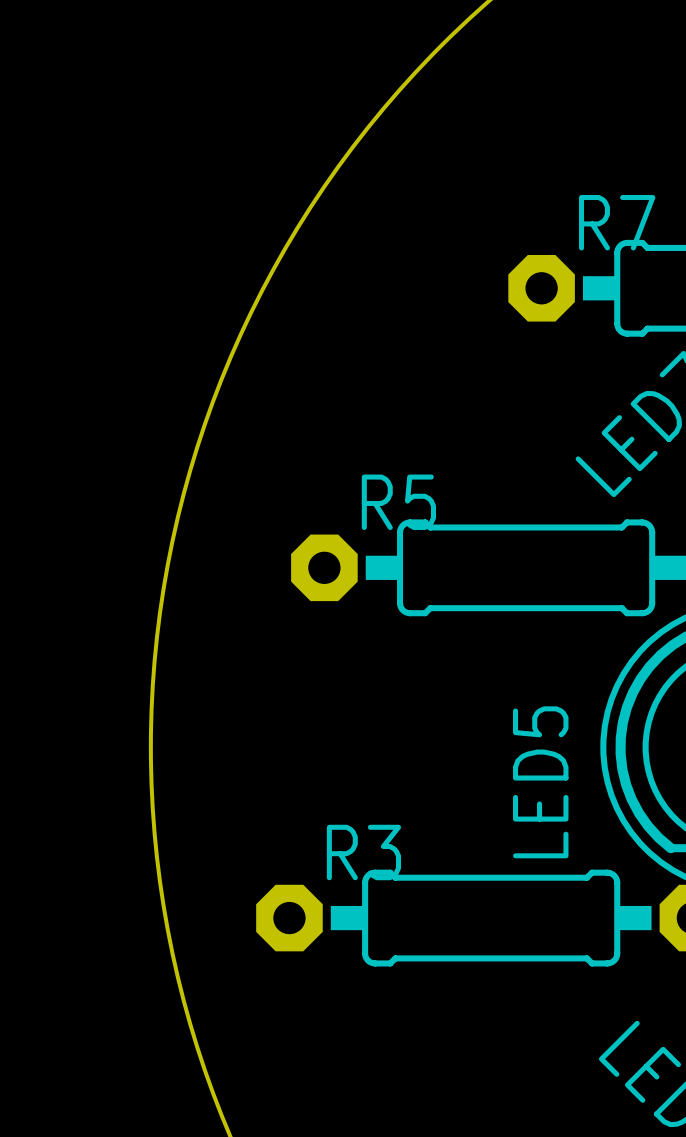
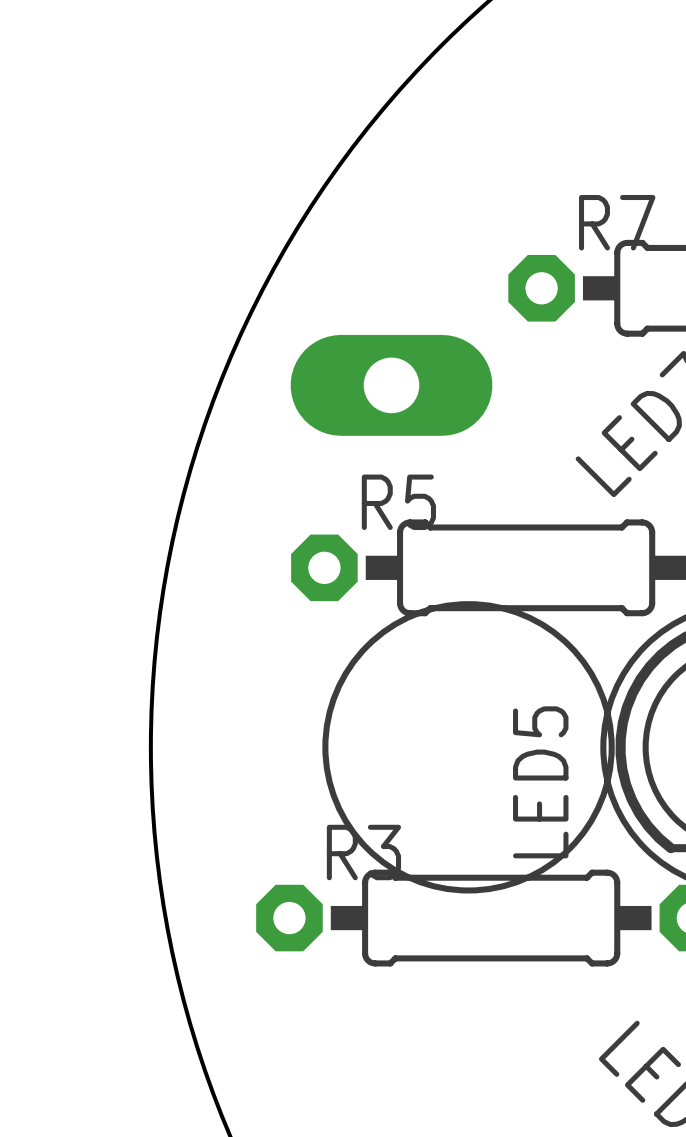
part: none -> (391, 385)
drawing: none -> [322, 601, 615, 894]

